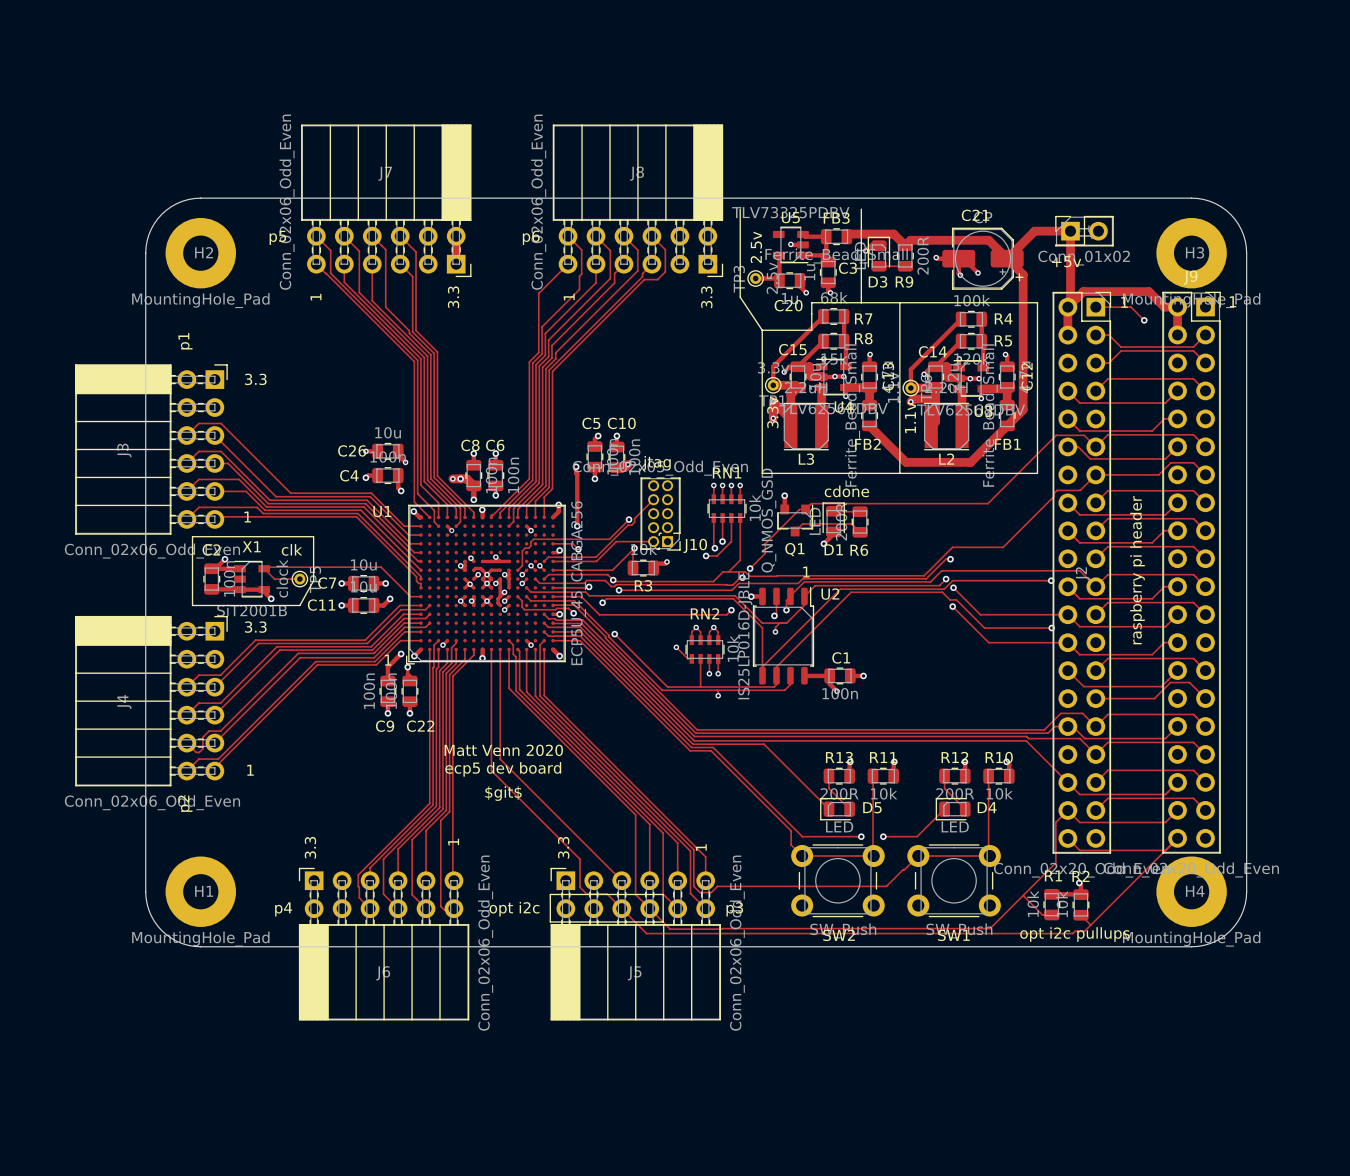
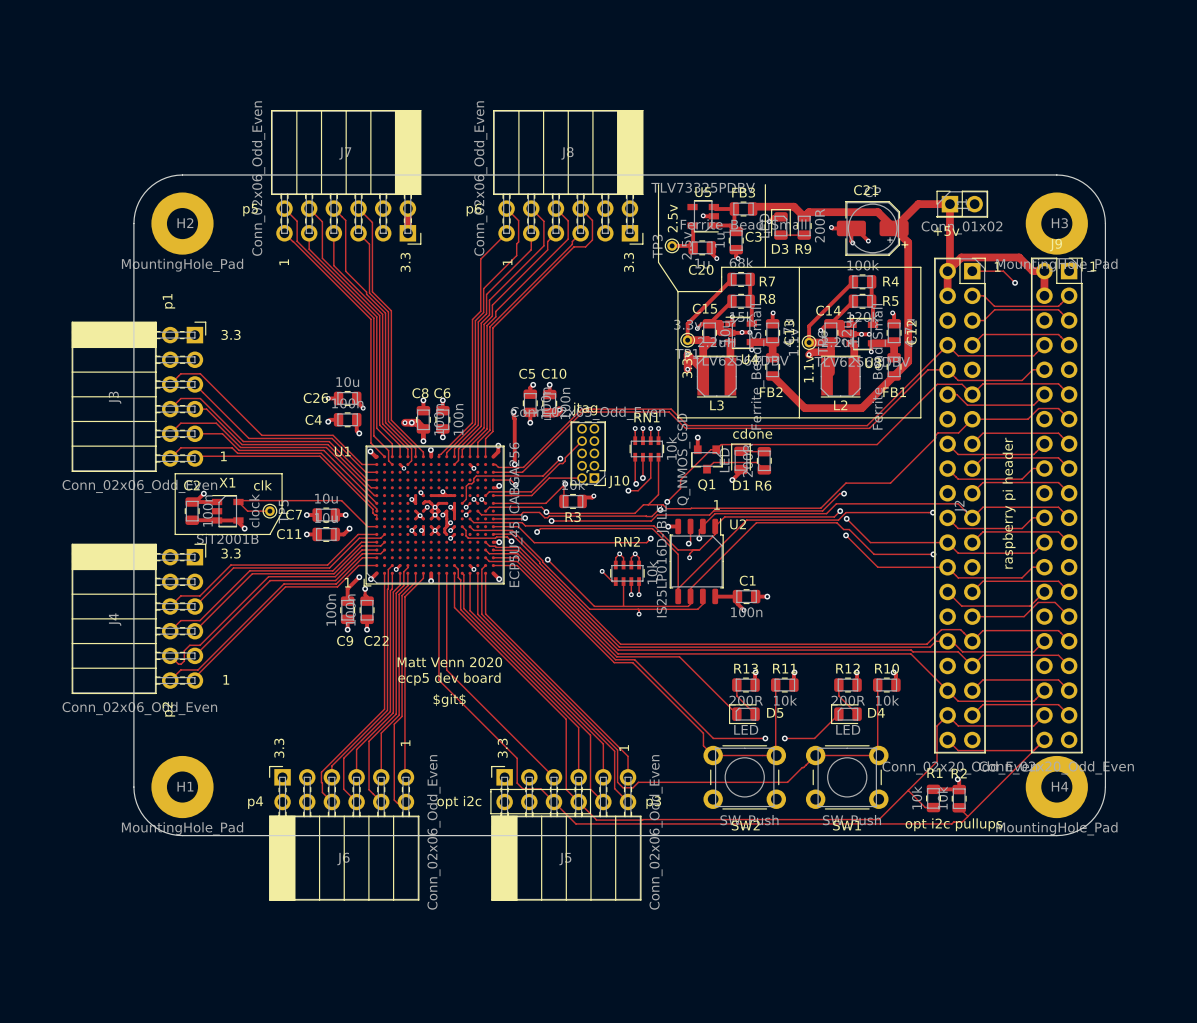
track: none -> (947, 345) (867, 425) (687, 425) (671, 409) (581, 409) (523, 467) (498, 467) (493, 464)
track: none -> (947, 369) (928, 369) (869, 428) (685, 428) (669, 412) (582, 412) (522, 472) (493, 472)

